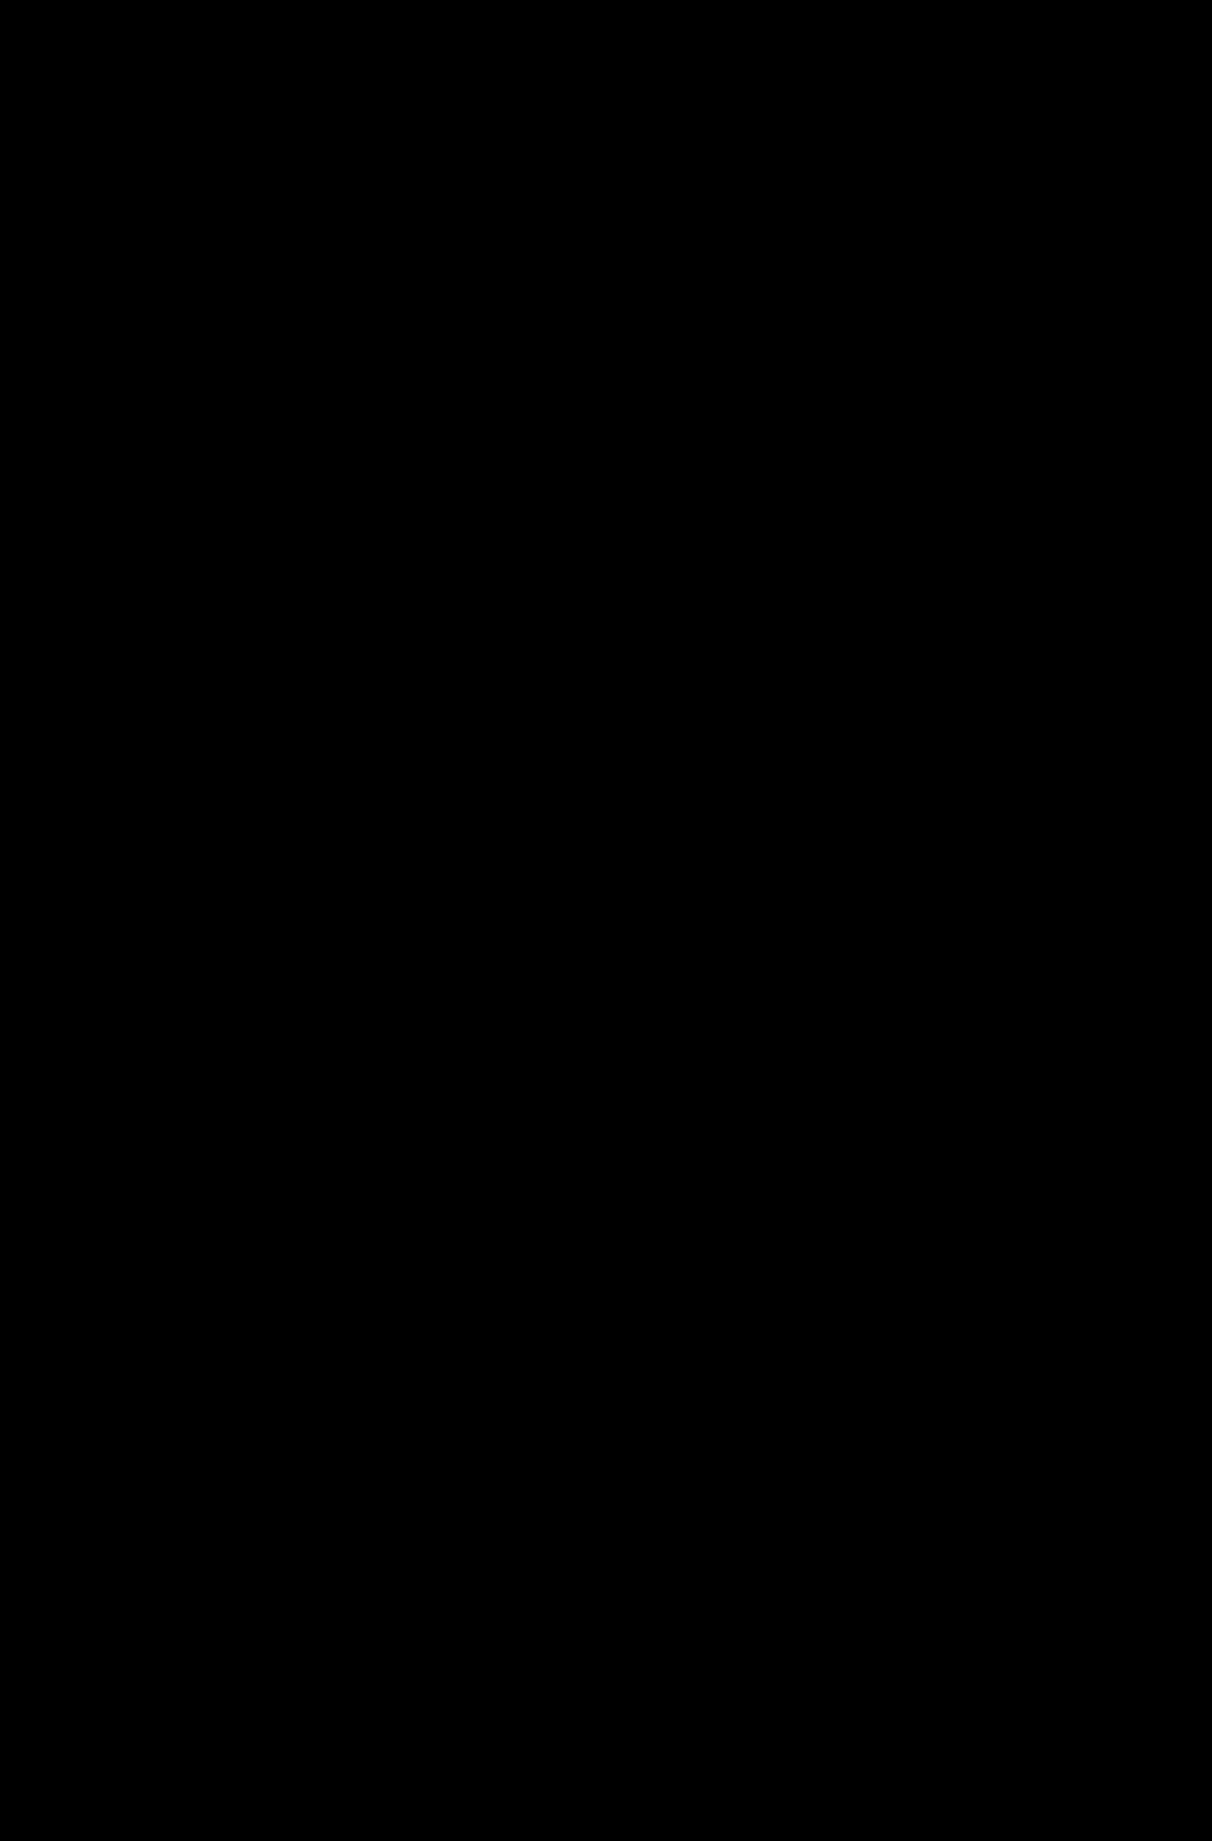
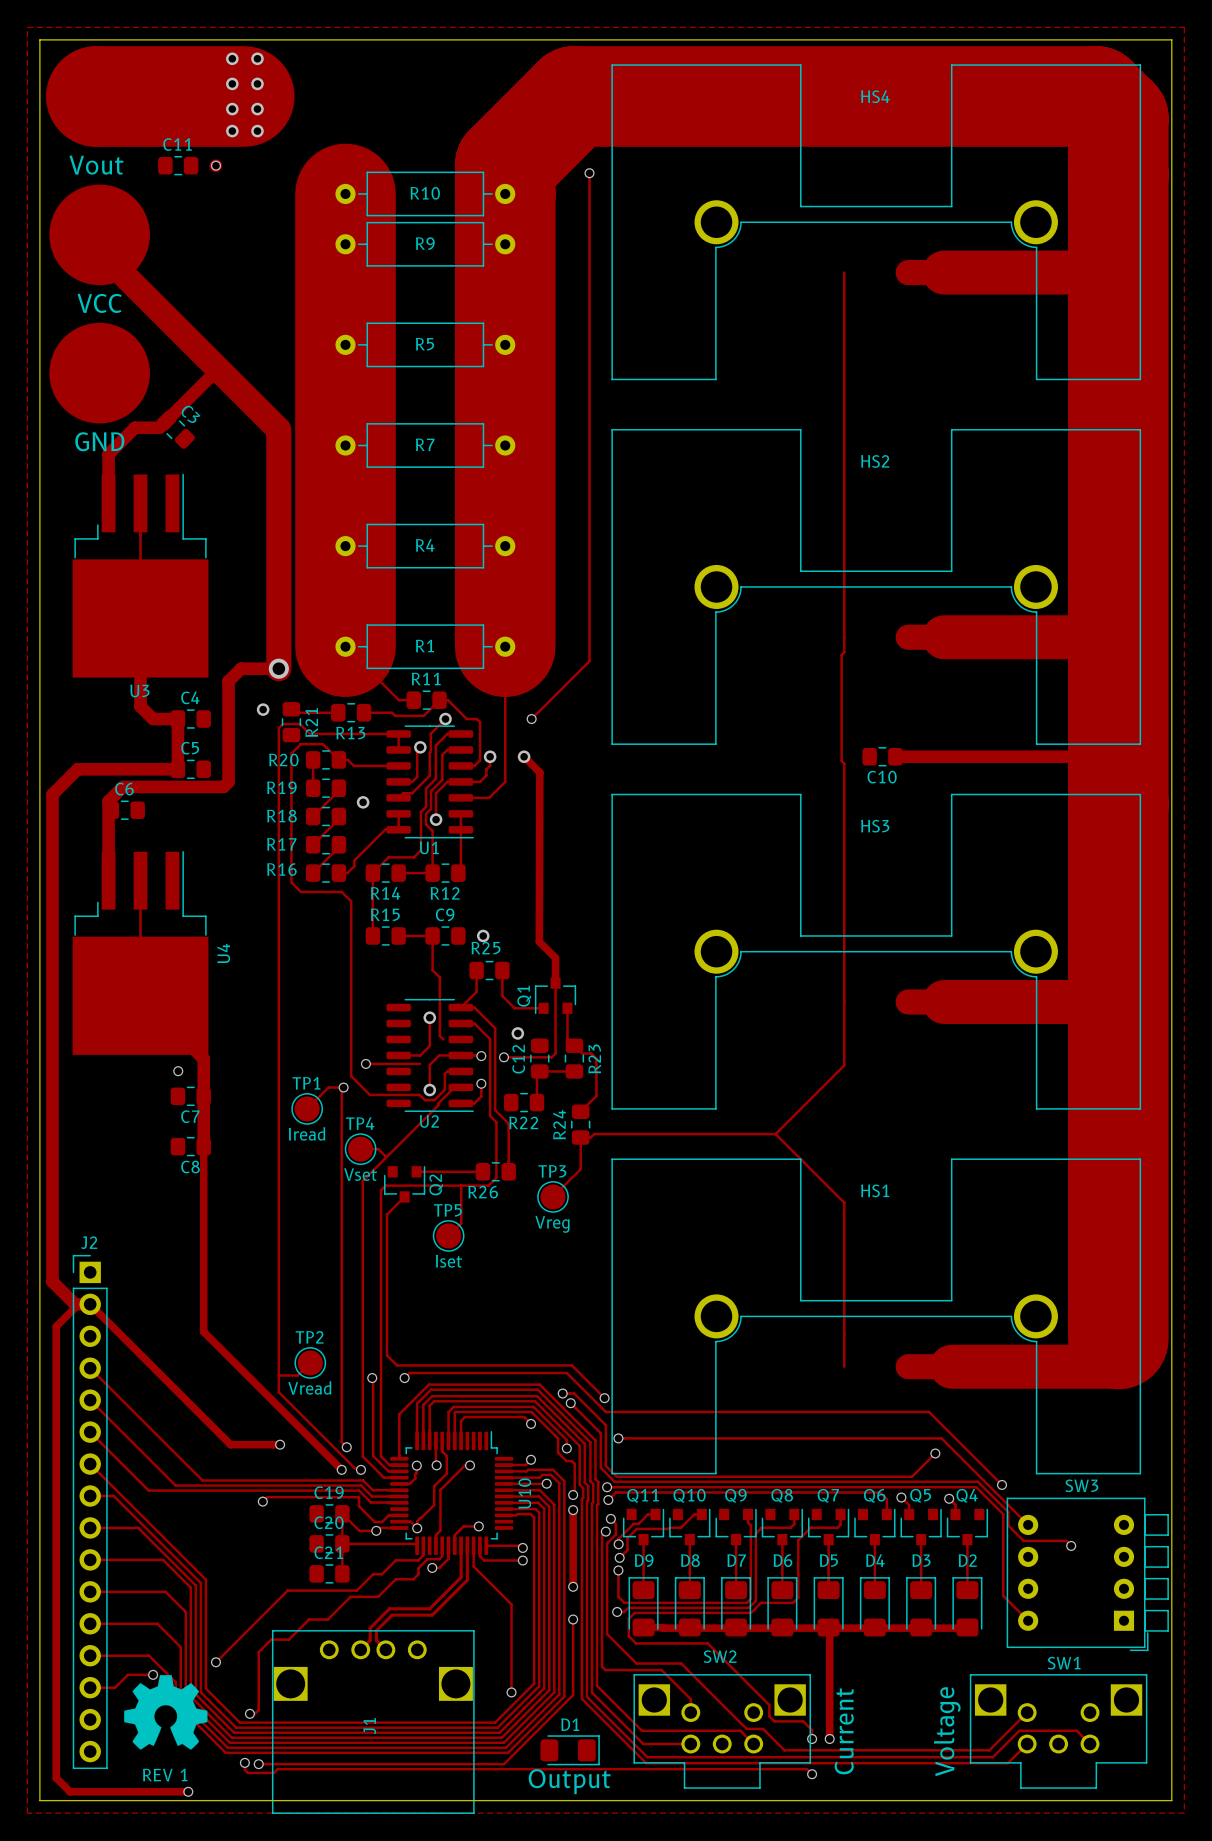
zone outline: none -> (27, 27) (1184, 27) (1184, 1813) (27, 1813) (27, 27)
board edge: none -> (39, 39) (39, 1800) (1171, 1800) (1171, 39) (39, 39)
via: none -> (232, 58)
via: none -> (257, 58)
via: none -> (232, 83)
via: none -> (257, 83)
track: none -> (96, 96) (244, 96)
via: none -> (232, 109)
via: none -> (257, 109)
via: none -> (232, 131)
via: none -> (257, 131)
text: none -> Vout (96, 165)
C11: none -> (178, 165)
track: none -> (215, 165) (215, 165)
via: none -> (215, 165)
track: none -> (589, 173) (589, 661) (531, 719)
via: none -> (589, 173)
track: none -> (345, 193) (345, 646) (398, 700) (413, 700)
R10: none -> (425, 193)
HS4: none -> (876, 222)
part: none -> (99, 234)
R9: none -> (425, 244)
track: none -> (99, 250) (278, 429)
track: none -> (844, 272) (844, 652) (841, 655) (841, 760) (844, 763) (844, 1065) (775, 1134)
track: none -> (908, 272) (1099, 272)
text: none -> VCC (99, 303)
R5: none -> (425, 344)
track: none -> (216, 367) (216, 371) (159, 427) (134, 427) (108, 454) (108, 503)
part: none -> (99, 373)
C3: none -> (175, 429)
track: none -> (278, 432) (278, 668) (241, 668) (228, 681) (228, 781) (223, 786) (122, 786) (108, 801) (108, 880)
text: none -> GND (99, 441)
R7: none -> (425, 445)
track: none -> (140, 503) (140, 706) (153, 719) (177, 719) (177, 769) (77, 769) (52, 794) (52, 1281) (75, 1304)
R4: none -> (425, 546)
U3: none -> (140, 575)
HS2: none -> (876, 586)
track: none -> (908, 637) (1093, 637)
R1: none -> (425, 646)
via: none -> (278, 668)
R11: none -> (426, 700)
via: none -> (263, 709)
track: none -> (291, 709) (294, 712) (338, 712)
R13: none -> (351, 712)
track: none -> (364, 712) (392, 712) (395, 715) (423, 715) (439, 700) (448, 700) (466, 719) (476, 719) (480, 722) (480, 760) (474, 765) (460, 765)
C4: none -> (190, 719)
track: none -> (445, 719) (430, 733) (429, 775) (412, 793) (403, 793) (398, 797)
via: none -> (445, 719)
via: none -> (531, 719)
R21: none -> (291, 722)
track: none -> (460, 734) (447, 734) (435, 745) (435, 778) (426, 788) (426, 806) (420, 811) (420, 850) (414, 857) (388, 857) (372, 873) (372, 935)
track: none -> (420, 747) (417, 750) (417, 776) (412, 781) (398, 781)
via: none -> (420, 747)
track: none -> (398, 749) (398, 734) (309, 734) (299, 724) (282, 724) (278, 728) (278, 1392) (354, 1468) (360, 1469) (357, 1469)
track: none -> (460, 749) (447, 749) (442, 755) (442, 779) (431, 791) (431, 808) (426, 813) (426, 824) (432, 831) (432, 873) (398, 873)
track: none -> (490, 756) (490, 765) (486, 769) (486, 775) (480, 781) (447, 781) (436, 793) (436, 819)
via: none -> (490, 756)
track: none -> (524, 756) (539, 772) (539, 941) (555, 957) (555, 1053) (551, 1057) (503, 1057)
via: none -> (524, 756)
C10: none -> (882, 756)
track: none -> (895, 756) (1071, 756) (1118, 803)
track: none -> (313, 759) (313, 788)
R20: none -> (326, 759)
track: none -> (398, 765) (353, 765) (347, 759) (338, 759) (322, 744) (300, 744) (291, 753) (291, 882) (300, 891) (341, 891) (351, 901) (351, 1076) (369, 1094) (419, 1094) (424, 1100) (434, 1100) (444, 1089) (444, 1073) (447, 1071) (460, 1071)
C5: none -> (190, 769)
U1: none -> (430, 781)
R19: none -> (326, 788)
track: none -> (338, 788) (338, 790) (313, 816)
track: none -> (460, 797) (489, 797) (505, 781) (505, 165) (574, 96) (1096, 96) (1118, 118) (1118, 1339)
via: none -> (363, 802)
C6: none -> (124, 810)
track: none -> (398, 813) (398, 829) (385, 829) (354, 860) (354, 866) (347, 873) (338, 873)
track: none -> (460, 813) (460, 870) (458, 873)
R18: none -> (326, 816)
track: none -> (338, 816) (338, 819) (313, 844)
via: none -> (436, 819)
R17: none -> (326, 844)
track: none -> (338, 844) (338, 847) (313, 873)
R16: none -> (326, 873)
R14: none -> (385, 873)
R12: none -> (445, 873)
track: none -> (140, 880) (140, 995) (203, 1058) (203, 1331) (341, 1469)
R15: none -> (385, 935)
track: none -> (398, 935) (432, 935) (432, 970) (439, 977) (439, 1035) (443, 1039)
C9: none -> (445, 935)
via: none -> (483, 935)
HS3: none -> (876, 951)
U4: none -> (140, 952)
track: none -> (476, 970) (476, 991) (460, 1007)
R25: none -> (489, 970)
track: none -> (502, 970) (502, 996) (514, 1008) (543, 1008)
Q1: none -> (555, 995)
track: none -> (908, 1002) (1099, 1002)
track: none -> (460, 1007) (474, 1007) (495, 1028) (495, 1110) (508, 1123) (508, 1171)
track: none -> (567, 1008) (567, 1038) (582, 1053) (591, 1053) (596, 1058) (596, 1096) (580, 1111)
track: none -> (429, 1017) (429, 1046) (420, 1055) (398, 1055)
via: none -> (429, 1017)
track: none -> (460, 1023) (474, 1023) (490, 1039) (490, 1115) (496, 1122) (496, 1177) (488, 1185) (385, 1185) (381, 1190) (381, 1456) (389, 1465) (399, 1465)
via: none -> (517, 1033)
U2: none -> (430, 1055)
track: none -> (481, 1056) (439, 1055) (429, 1064) (429, 1090)
via: none -> (481, 1056)
via: none -> (503, 1057)
C12: none -> (539, 1058)
R23: none -> (574, 1058)
track: none -> (365, 1063) (420, 1063)
via: none -> (365, 1063)
via: none -> (178, 1071)
track: none -> (574, 1071) (539, 1071) (536, 1074) (536, 1102)
track: none -> (481, 1083) (481, 1096) (474, 1103) (460, 1103)
via: none -> (481, 1083)
via: none -> (343, 1087)
track: none -> (460, 1087) (454, 1087) (362, 1180) (362, 1456) (383, 1477) (399, 1477)
via: none -> (429, 1090)
C7: none -> (190, 1096)
R22: none -> (524, 1102)
track: none -> (307, 1108) (328, 1087) (343, 1087) (341, 1089) (341, 1442) (346, 1447)
TP1: none -> Iread (307, 1108)
R24: none -> (580, 1124)
track: none -> (775, 1134) (594, 1134) (590, 1137) (580, 1137) (580, 1169) (553, 1196)
track: none -> (775, 1134) (844, 1202) (844, 1366)
C8: none -> (190, 1146)
track: none -> (360, 1149) (378, 1149) (385, 1157)
TP4: none -> Vset (360, 1149)
track: none -> (416, 1171) (482, 1171)
R26: none -> (495, 1171)
Q2: none -> (404, 1184)
track: none -> (461, 1185) (461, 1223) (448, 1235)
TP3: none -> Vreg (553, 1196)
track: none -> (404, 1199) (404, 1196) (387, 1214) (387, 1355) (397, 1365) (571, 1365) (603, 1398)
TP5: none -> Iset (448, 1235)
track: none -> (75, 1304) (75, 1307) (56, 1326) (56, 1777) (70, 1791) (188, 1791)
track: none -> (75, 1304) (90, 1304) (230, 1444) (280, 1444)
HS1: none -> (876, 1316)
track: none -> (310, 1362) (297, 1375) (278, 1375)
TP2: none -> Vread (310, 1362)
track: none -> (908, 1366) (1112, 1366)
track: none -> (90, 1368) (202, 1480) (363, 1480) (372, 1490) (399, 1490)
track: none -> (372, 1378) (373, 1456) (388, 1471) (399, 1471)
via: none -> (372, 1378)
track: none -> (404, 1378) (409, 1373) (566, 1373) (605, 1411) (929, 1411) (1002, 1484)
via: none -> (404, 1378)
track: none -> (562, 1393) (574, 1393) (605, 1425) (605, 1465) (616, 1476) (912, 1476) (935, 1453)
via: none -> (562, 1393)
via: none -> (604, 1398)
track: none -> (90, 1400) (175, 1485) (361, 1485) (372, 1496) (399, 1496)
track: none -> (570, 1403) (600, 1433) (600, 1467) (614, 1481) (977, 1481) (1008, 1512) (1008, 1525) (1023, 1540) (1066, 1540) (1071, 1545)
via: none -> (570, 1403)
track: none -> (531, 1423) (524, 1417) (464, 1417) (461, 1420) (461, 1441)
via: none -> (531, 1423)
track: none -> (90, 1432) (148, 1490) (359, 1490) (370, 1502) (399, 1502)
track: none -> (417, 1434) (417, 1403) (431, 1389) (537, 1389) (590, 1442) (590, 1481) (593, 1484) (592, 1692) (643, 1744) (690, 1744)
track: none -> (618, 1438) (941, 1438) (1028, 1524)
via: none -> (618, 1438)
track: none -> (423, 1441) (423, 1404) (431, 1396) (537, 1396) (584, 1443) (584, 1482) (588, 1486) (586, 1696) (647, 1757) (992, 1757) (1019, 1730) (1076, 1730) (1090, 1744)
track: none -> (429, 1441) (429, 1405) (434, 1401) (535, 1401) (579, 1445) (579, 1484) (583, 1488) (581, 1698) (646, 1763) (1007, 1763) (1027, 1744)
track: none -> (435, 1441) (436, 1465)
track: none -> (442, 1441) (442, 1451) (446, 1456) (446, 1473) (434, 1486) (434, 1505) (417, 1521) (417, 1528) (410, 1521) (399, 1521)
track: none -> (448, 1441) (448, 1412) (453, 1406) (533, 1406) (566, 1440) (566, 1448)
track: none -> (454, 1441) (455, 1411) (531, 1411) (558, 1438) (558, 1452) (566, 1461) (571, 1461) (574, 1463) (573, 1495)
via: none -> (280, 1444)
via: none -> (346, 1447)
via: none -> (566, 1448)
via: none -> (935, 1453)
track: none -> (399, 1458) (399, 1414) (428, 1384) (539, 1384) (595, 1440) (595, 1479) (598, 1482) (597, 1685) (642, 1730) (740, 1730) (753, 1744)
track: none -> (531, 1459) (525, 1465) (504, 1465)
via: none -> (531, 1459)
track: none -> (90, 1464) (205, 1579) (205, 1688) (239, 1722) (495, 1722) (534, 1683) (534, 1517) (530, 1514) (504, 1515)
track: none -> (416, 1465) (415, 1478) (409, 1483) (399, 1483)
via: none -> (416, 1465)
via: none -> (436, 1465)
track: none -> (470, 1465) (464, 1465) (440, 1489) (440, 1530) (435, 1535) (435, 1545)
via: none -> (470, 1465)
via: none -> (341, 1469)
via: none -> (360, 1469)
track: none -> (504, 1471) (553, 1469) (564, 1481) (564, 1696) (508, 1752) (225, 1752) (175, 1702) (175, 1682) (149, 1655) (90, 1655)
track: none -> (504, 1477) (539, 1477) (542, 1474) (550, 1474) (559, 1483) (559, 1694) (506, 1747) (227, 1747) (180, 1700) (180, 1647) (157, 1623) (90, 1623)
track: none -> (546, 1483) (504, 1483)
via: none -> (546, 1483)
via: none -> (1002, 1484)
track: none -> (607, 1487) (976, 1487) (1003, 1514) (1003, 1595) (1028, 1620) (1024, 1624)
via: none -> (607, 1487)
track: none -> (504, 1490) (539, 1490) (554, 1504) (554, 1692) (503, 1742) (229, 1742) (185, 1698) (185, 1611) (165, 1591) (90, 1591)
U10: none -> (451, 1492)
via: none -> (573, 1495)
track: none -> (90, 1496) (113, 1496) (200, 1583) (200, 1692) (236, 1727) (497, 1727) (539, 1686) (539, 1512) (535, 1509) (504, 1509)
track: none -> (504, 1496) (539, 1496) (549, 1506) (549, 1690) (501, 1737) (231, 1737) (190, 1696) (190, 1587) (163, 1559) (90, 1559)
track: none -> (901, 1497) (909, 1505) (909, 1514)
via: none -> (901, 1497)
track: none -> (949, 1498) (955, 1505) (955, 1514)
via: none -> (949, 1498)
track: none -> (608, 1500) (615, 1492) (880, 1492) (886, 1499) (886, 1514)
via: none -> (608, 1500)
track: none -> (262, 1501) (267, 1497) (358, 1497) (359, 1506) (374, 1522) (382, 1522) (388, 1515) (399, 1515)
via: none -> (262, 1501)
track: none -> (504, 1502) (538, 1502) (544, 1508) (544, 1688) (499, 1732) (234, 1732) (195, 1694) (195, 1585) (138, 1527) (90, 1527)
track: none -> (573, 1510) (573, 1588)
via: none -> (573, 1510)
J2: none -> (90, 1511)
C19: none -> (329, 1513)
track: none -> (655, 1514) (647, 1514) (638, 1523) (633, 1523) (618, 1538) (618, 1544)
track: none -> (701, 1514) (694, 1514) (681, 1527) (636, 1528) (627, 1538) (627, 1550) (619, 1557)
track: none -> (748, 1514) (748, 1522) (750, 1525) (750, 1598) (746, 1602) (624, 1602) (618, 1596) (618, 1570)
track: none -> (794, 1514) (794, 1524) (790, 1527) (761, 1527) (755, 1533) (755, 1600) (748, 1607) (628, 1607) (624, 1611) (617, 1611)
track: none -> (840, 1514) (840, 1524) (837, 1527) (810, 1527) (798, 1540) (798, 1597) (793, 1602) (761, 1602) (750, 1612) (634, 1612) (628, 1618) (628, 1636) (635, 1643) (707, 1643) (769, 1705) (769, 1716) (774, 1721) (803, 1721) (812, 1730) (812, 1738)
track: none -> (610, 1518) (615, 1523) (615, 1534) (607, 1543) (607, 1634) (636, 1663) (681, 1663) (746, 1728) (763, 1728) (784, 1750) (989, 1750) (1027, 1712)
via: none -> (610, 1518)
track: none -> (478, 1526) (463, 1526) (454, 1535) (454, 1545)
via: none -> (478, 1526)
track: none -> (399, 1527) (359, 1530) (342, 1513) (342, 1573)
Q11: none -> (643, 1527)
Q10: none -> (689, 1527)
Q9: none -> (736, 1527)
Q8: none -> (782, 1527)
Q7: none -> (828, 1527)
Q6: none -> (874, 1527)
Q5: none -> (921, 1527)
Q4: none -> (967, 1527)
via: none -> (417, 1528)
via: none -> (376, 1530)
track: none -> (605, 1531) (602, 1535) (602, 1666) (605, 1670) (661, 1670) (690, 1699) (690, 1712)
via: none -> (605, 1531)
track: none -> (643, 1539) (643, 1590)
track: none -> (689, 1539) (689, 1590)
track: none -> (736, 1539) (736, 1590)
track: none -> (782, 1539) (782, 1590)
track: none -> (828, 1539) (828, 1590)
track: none -> (874, 1539) (874, 1590)
track: none -> (921, 1539) (921, 1590)
track: none -> (967, 1539) (967, 1590)
C20: none -> (329, 1543)
track: none -> (342, 1543) (415, 1543) (417, 1545)
via: none -> (618, 1544)
track: none -> (423, 1545) (423, 1555) (418, 1560) (395, 1560) (381, 1574) (373, 1574) (356, 1590) (287, 1590) (215, 1662)
track: none -> (442, 1545) (442, 1556) (439, 1559) (427, 1559) (418, 1568) (418, 1574) (413, 1579) (395, 1579) (378, 1596) (350, 1596) (327, 1619) (309, 1619) (288, 1639) (271, 1639) (258, 1652) (258, 1710) (254, 1713) (249, 1713)
track: none -> (448, 1545) (448, 1558) (439, 1567) (432, 1567)
track: none -> (461, 1545) (461, 1577) (429, 1608) (389, 1608) (370, 1628) (370, 1640) (360, 1649)
track: none -> (467, 1545) (467, 1580) (432, 1615) (392, 1615) (376, 1630) (376, 1640) (385, 1649)
track: none -> (473, 1545) (473, 1566) (511, 1604) (511, 1692)
track: none -> (479, 1545) (479, 1556) (484, 1560) (522, 1560)
track: none -> (486, 1545) (520, 1545) (522, 1547)
via: none -> (1071, 1545)
via: none -> (522, 1547)
via: none -> (619, 1557)
via: none -> (522, 1560)
via: none -> (432, 1567)
via: none -> (618, 1570)
C21: none -> (329, 1573)
SW3: none -> (1087, 1574)
via: none -> (573, 1586)
D9: none -> (643, 1606)
D8: none -> (689, 1606)
D7: none -> (736, 1606)
D6: none -> (782, 1606)
D5: none -> (828, 1606)
D4: none -> (874, 1606)
D3: none -> (921, 1606)
D2: none -> (967, 1606)
via: none -> (617, 1611)
track: none -> (573, 1619) (573, 1694) (503, 1764) (258, 1764)
via: none -> (573, 1619)
track: none -> (643, 1627) (967, 1627)
track: none -> (836, 1628) (829, 1635) (829, 1738)
via: none -> (215, 1662)
track: none -> (153, 1674) (127, 1674) (115, 1687) (90, 1687) (92, 1689)
via: none -> (153, 1674)
drawing: none -> [124, 1675, 208, 1750]
via: none -> (511, 1692)
via: none -> (249, 1713)
J1: none -> (373, 1722)
text: none -> Current (844, 1731)
SW2: none -> (722, 1731)
SW1: none -> (1058, 1731)
text: none -> Voltage (947, 1731)
via: none -> (812, 1738)
via: none -> (829, 1738)
D1: none -> (570, 1750)
track: none -> (244, 1762) (244, 1769) (247, 1772) (273, 1772) (277, 1769) (807, 1769) (812, 1774)
via: none -> (244, 1762)
via: none -> (258, 1764)
text: none -> REV 1 (165, 1775)
via: none -> (812, 1774)
text: none -> Output (569, 1781)
via: none -> (188, 1791)

